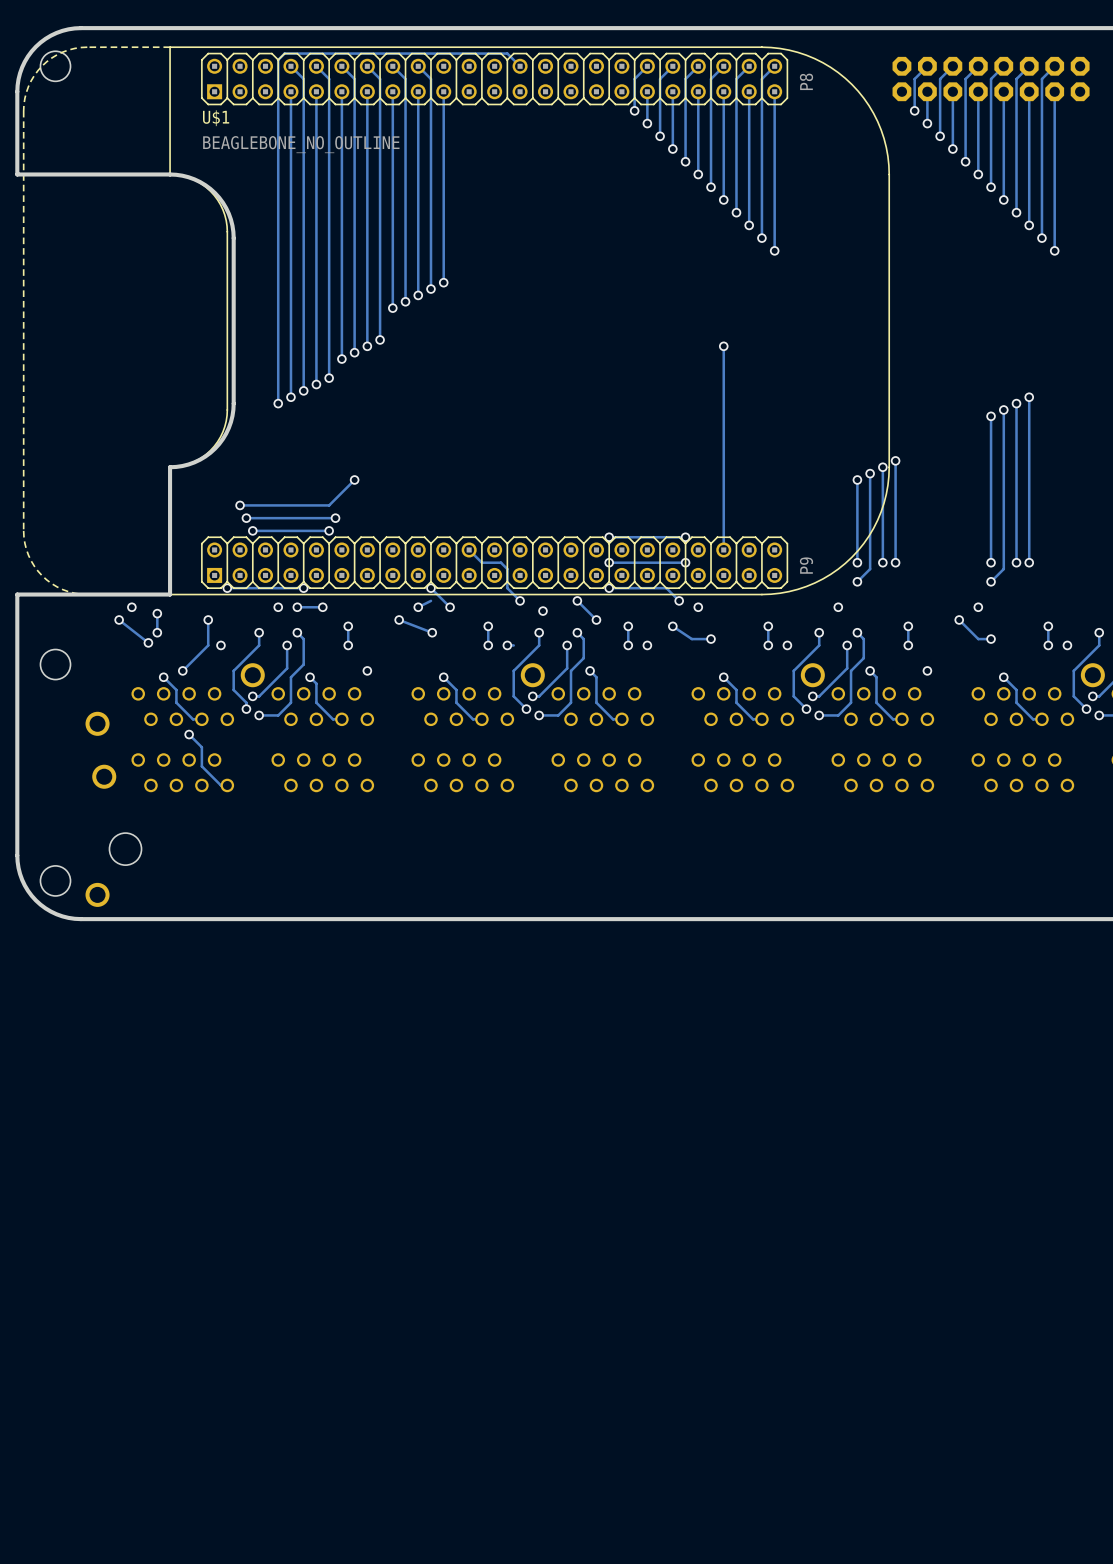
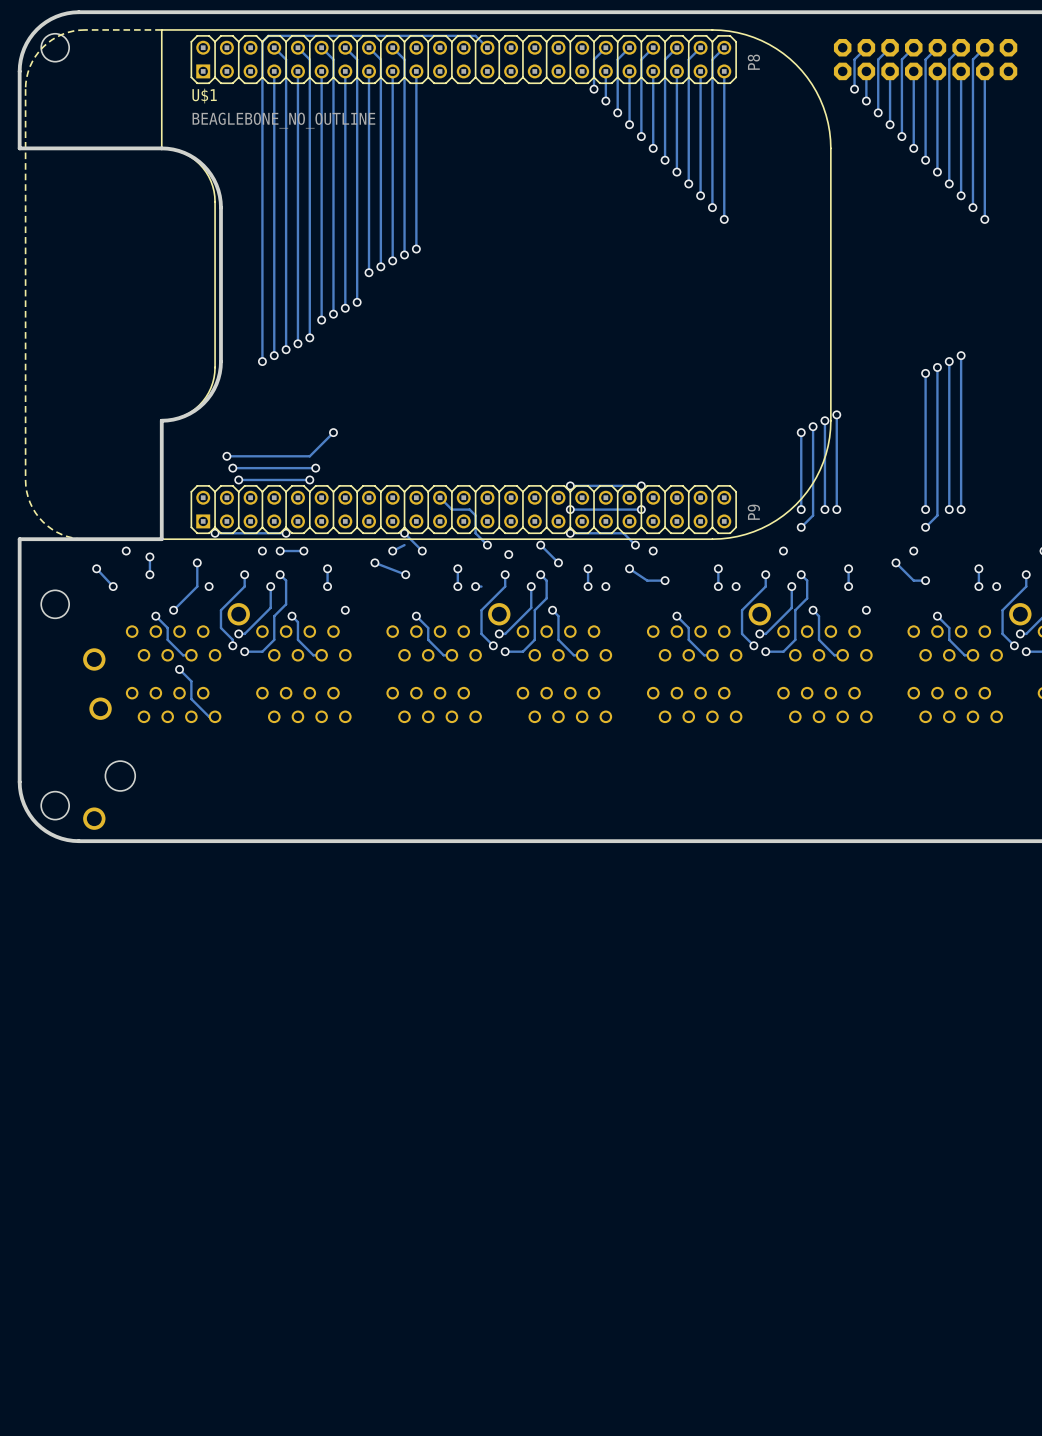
track: (723, 346) (723, 549) -> none
via: (723, 346) -> none
track: (119, 619) (148, 642) -> none
via: (119, 619) -> none
track: none -> (96, 568) (113, 586)
via: none -> (96, 568)
via: (148, 642) -> none
via: none -> (113, 586)

